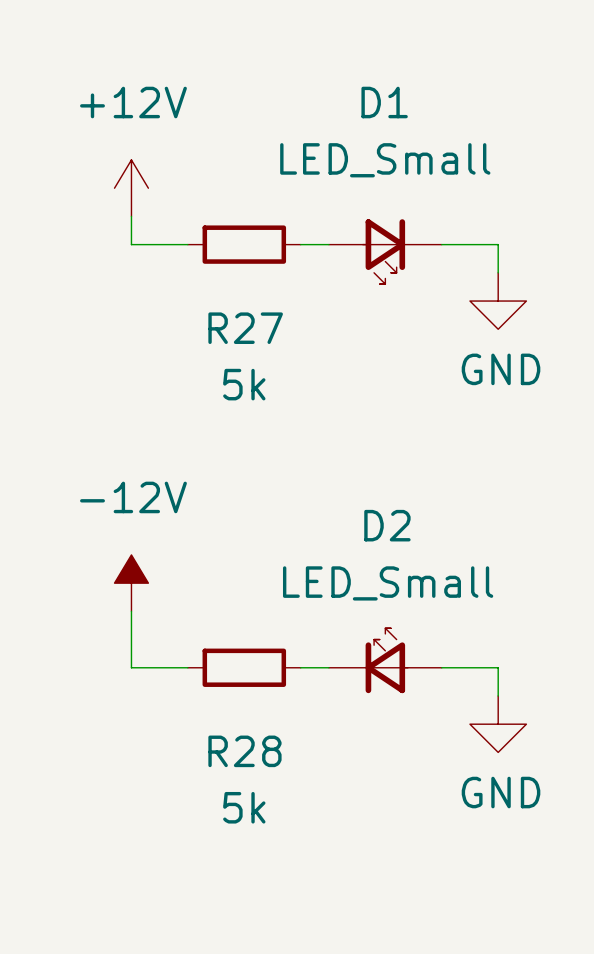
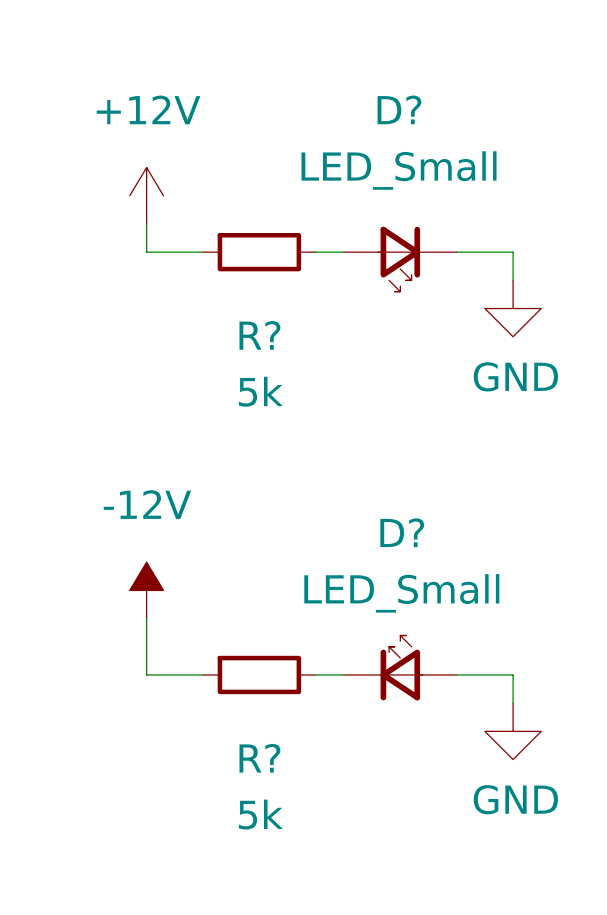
D1 name: D1 (384, 102) -> D? (399, 109)
R27 name: R27 (245, 328) -> R? (259, 335)
D2 name: D2 (387, 525) -> D? (402, 532)
R28 name: R28 (244, 751) -> R? (259, 758)

